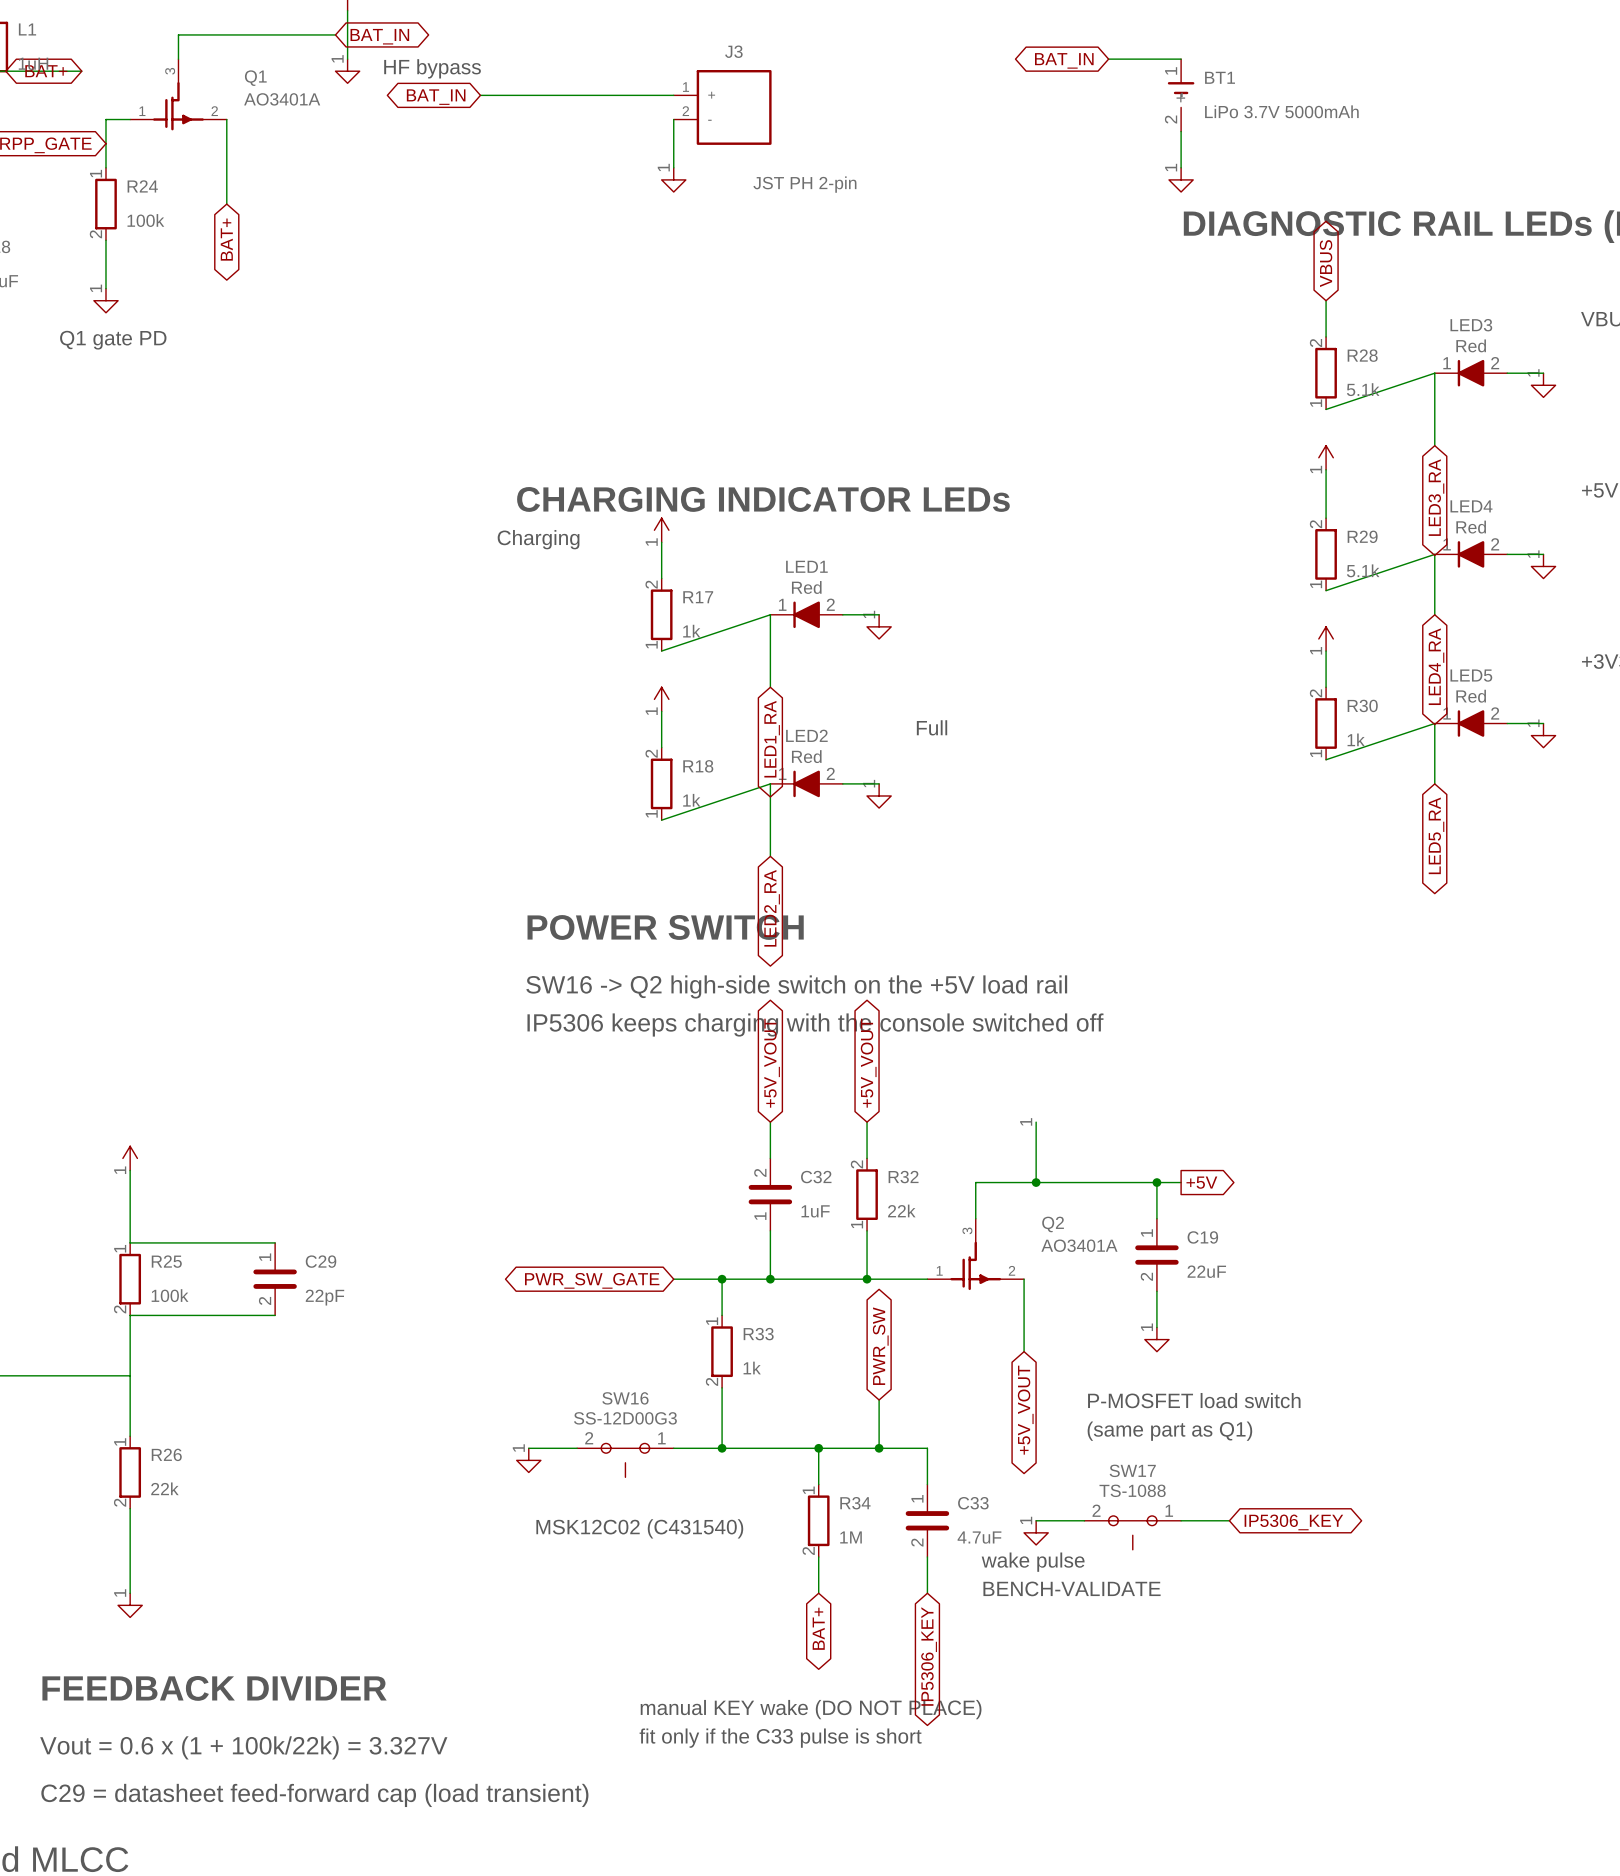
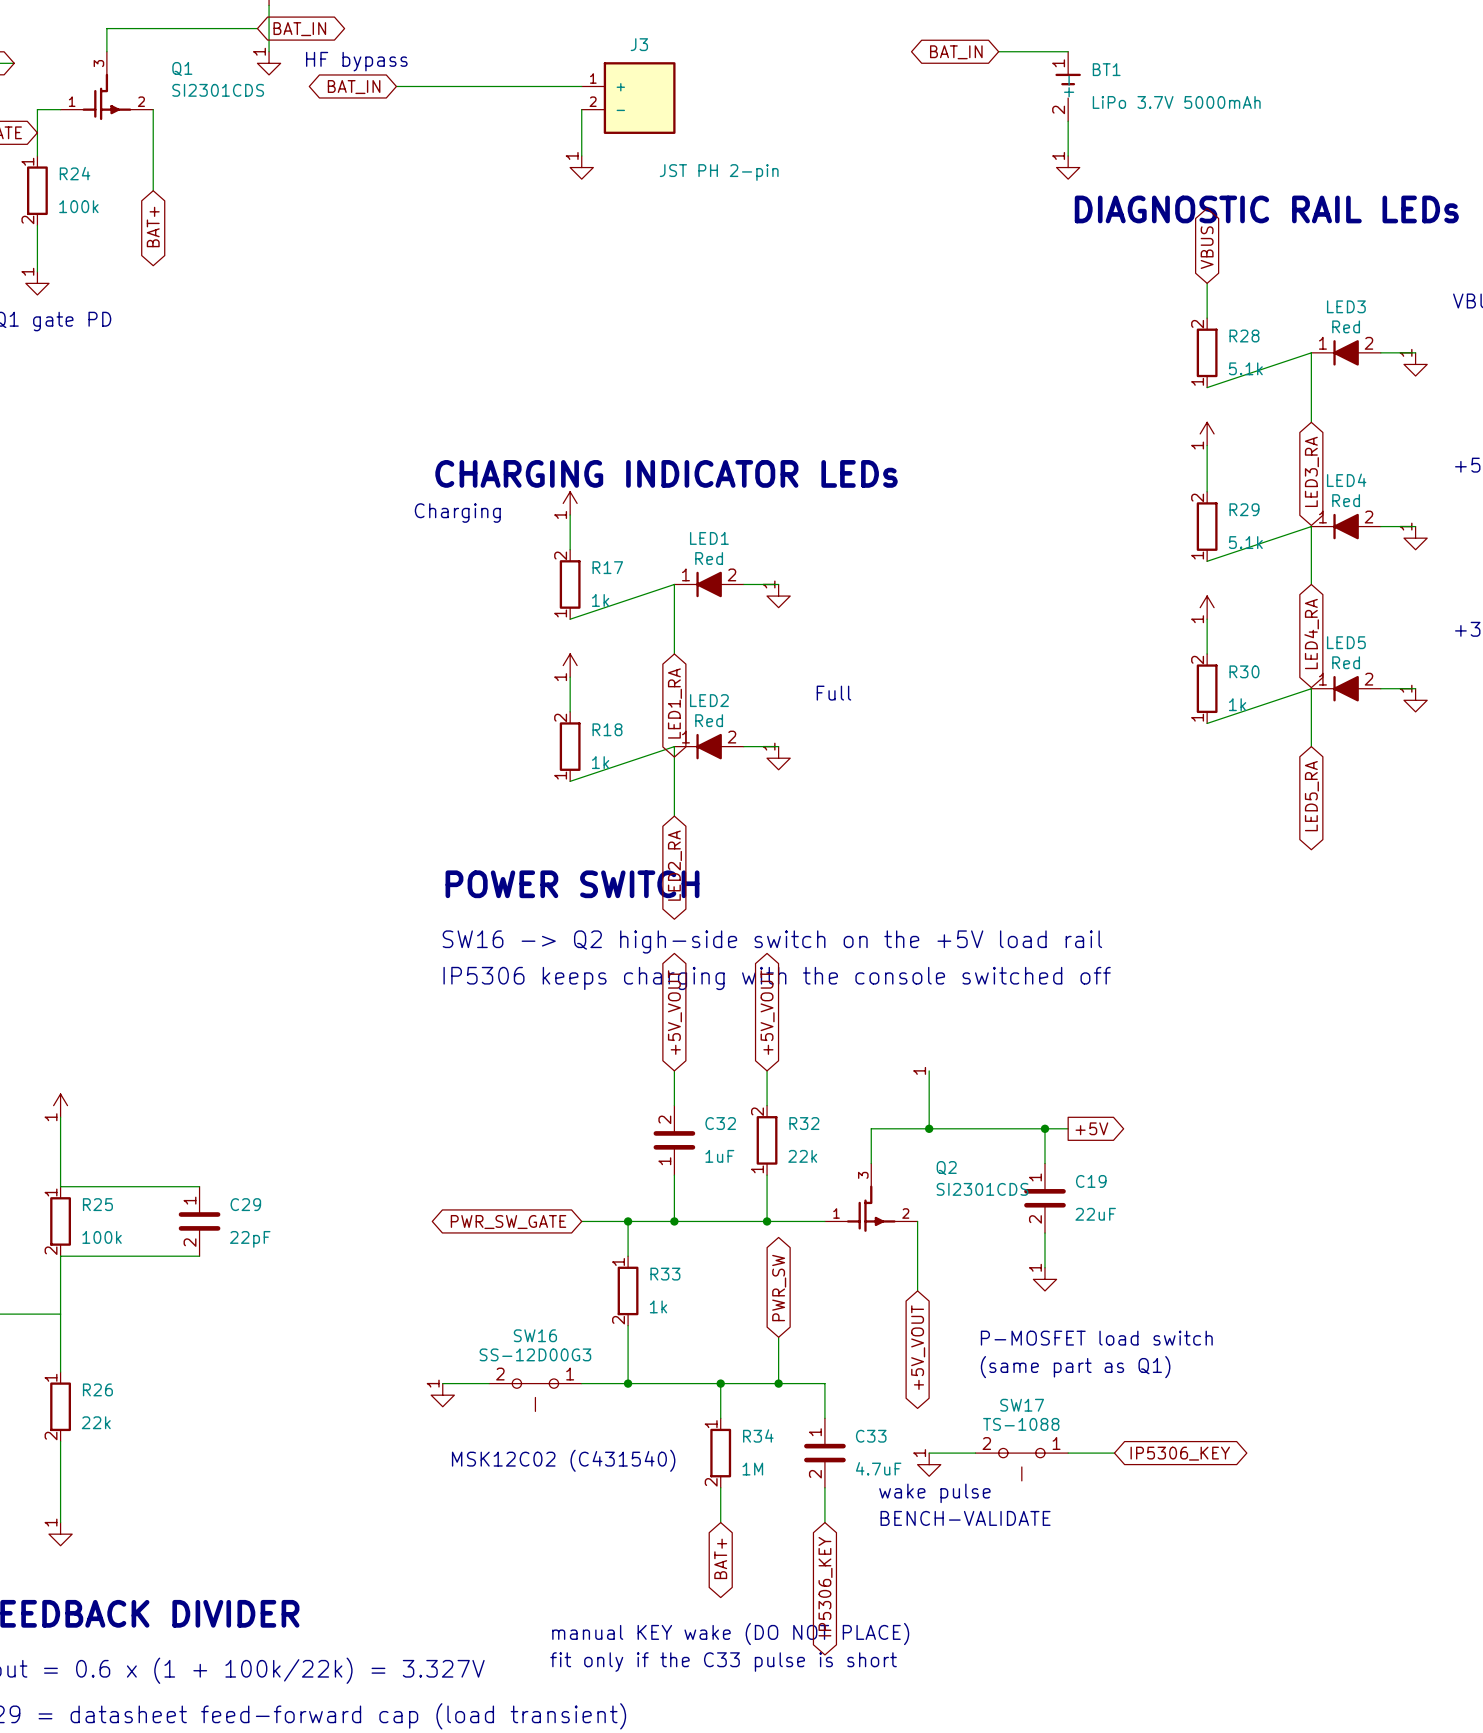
Q1 value: AO3401A (282, 99) -> SI2301CDS (218, 90)
Q2 value: AO3401A (1079, 1245) -> SI2301CDS (982, 1189)

